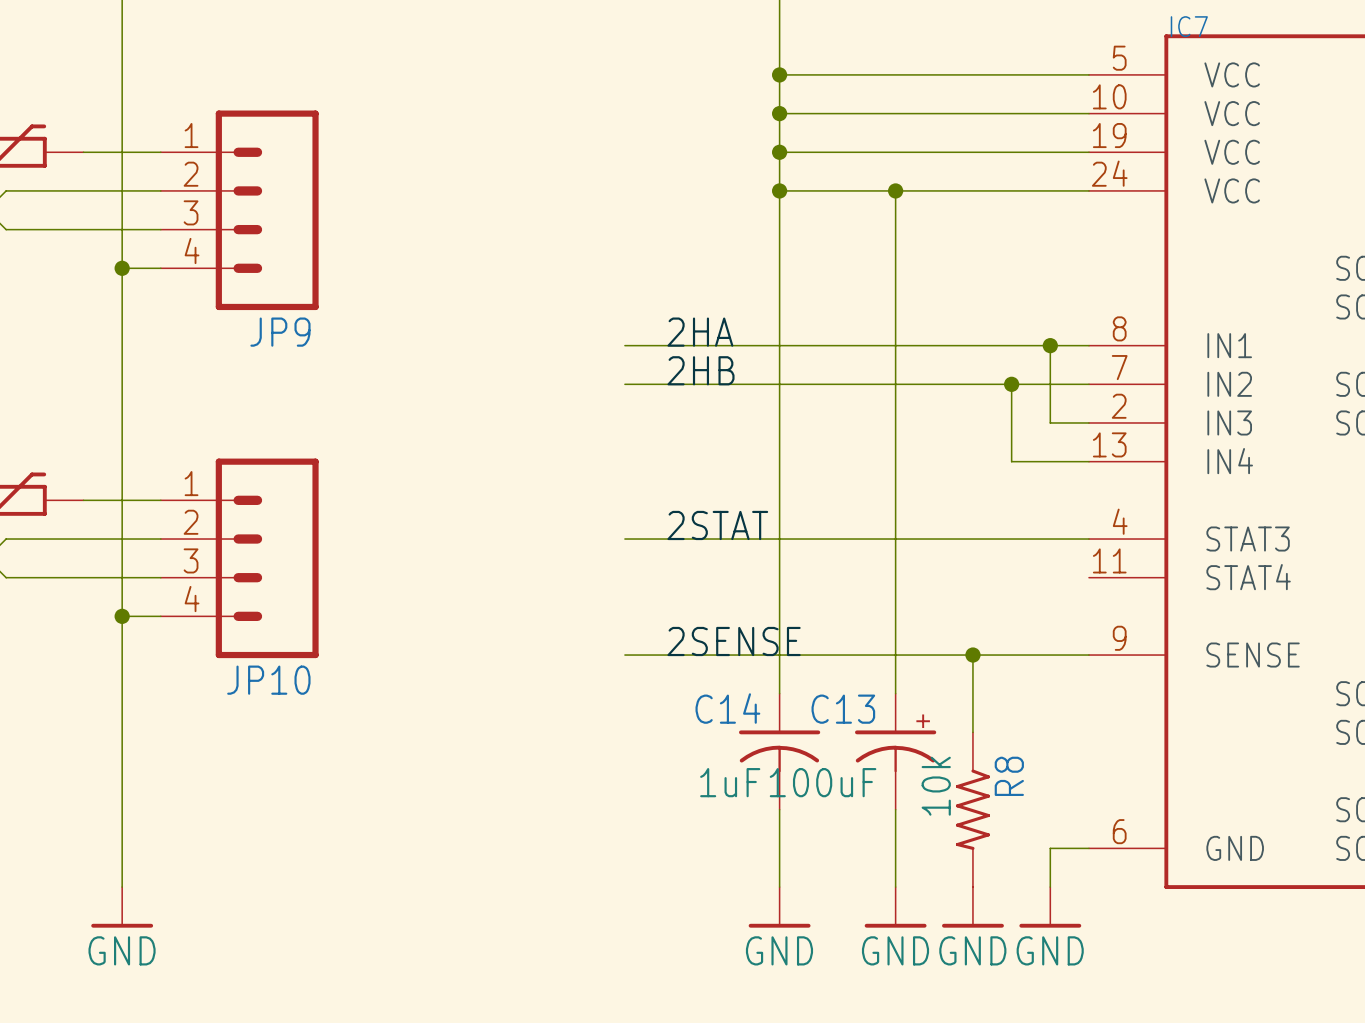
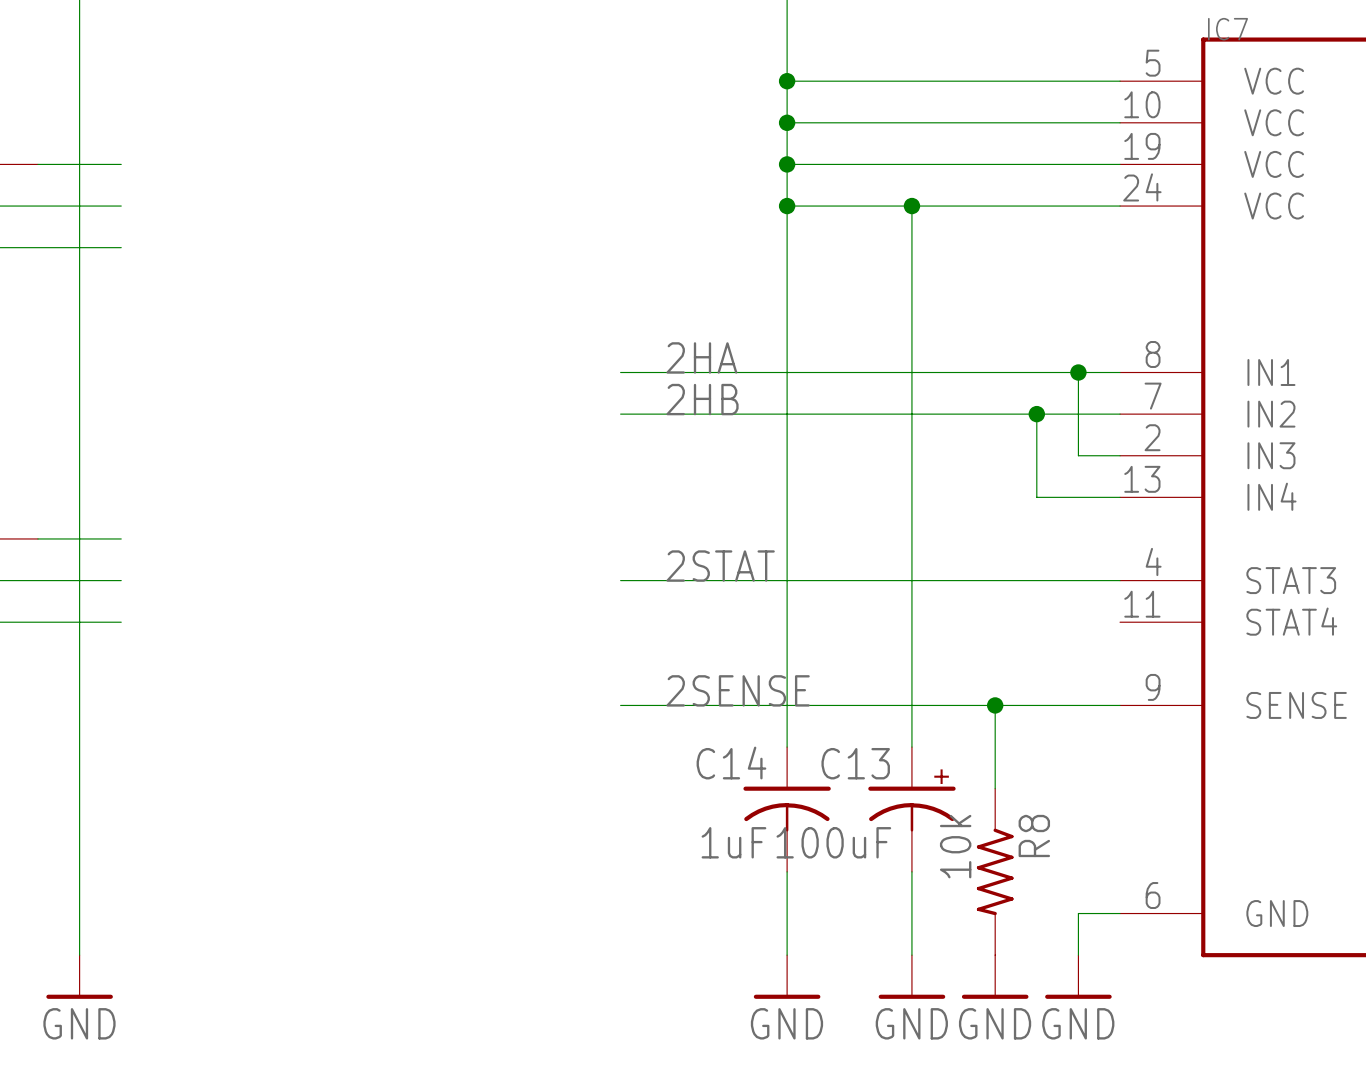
JP9: (239, 210) -> none
wire: (122, 268) (160, 268) -> none
junction: (122, 268) -> none
JP10: (239, 558) -> none
wire: (122, 616) (160, 616) -> none
junction: (122, 616) -> none

